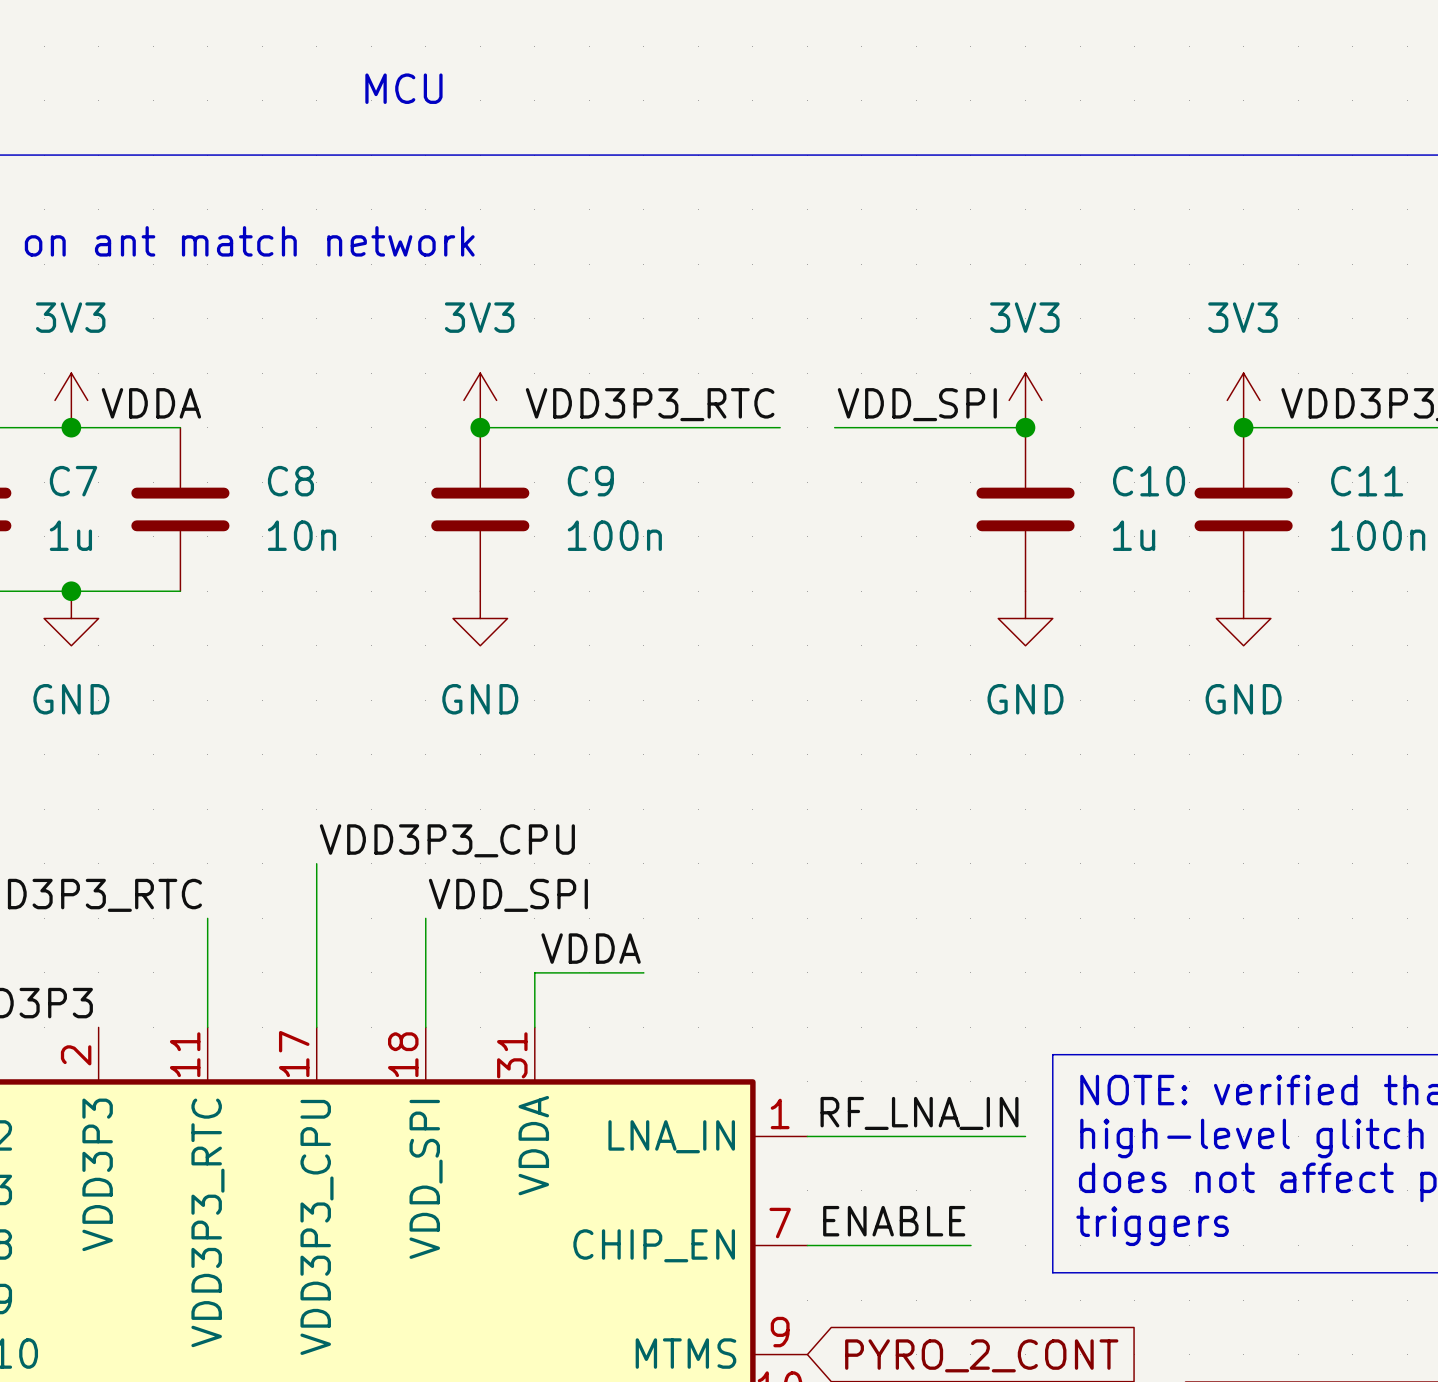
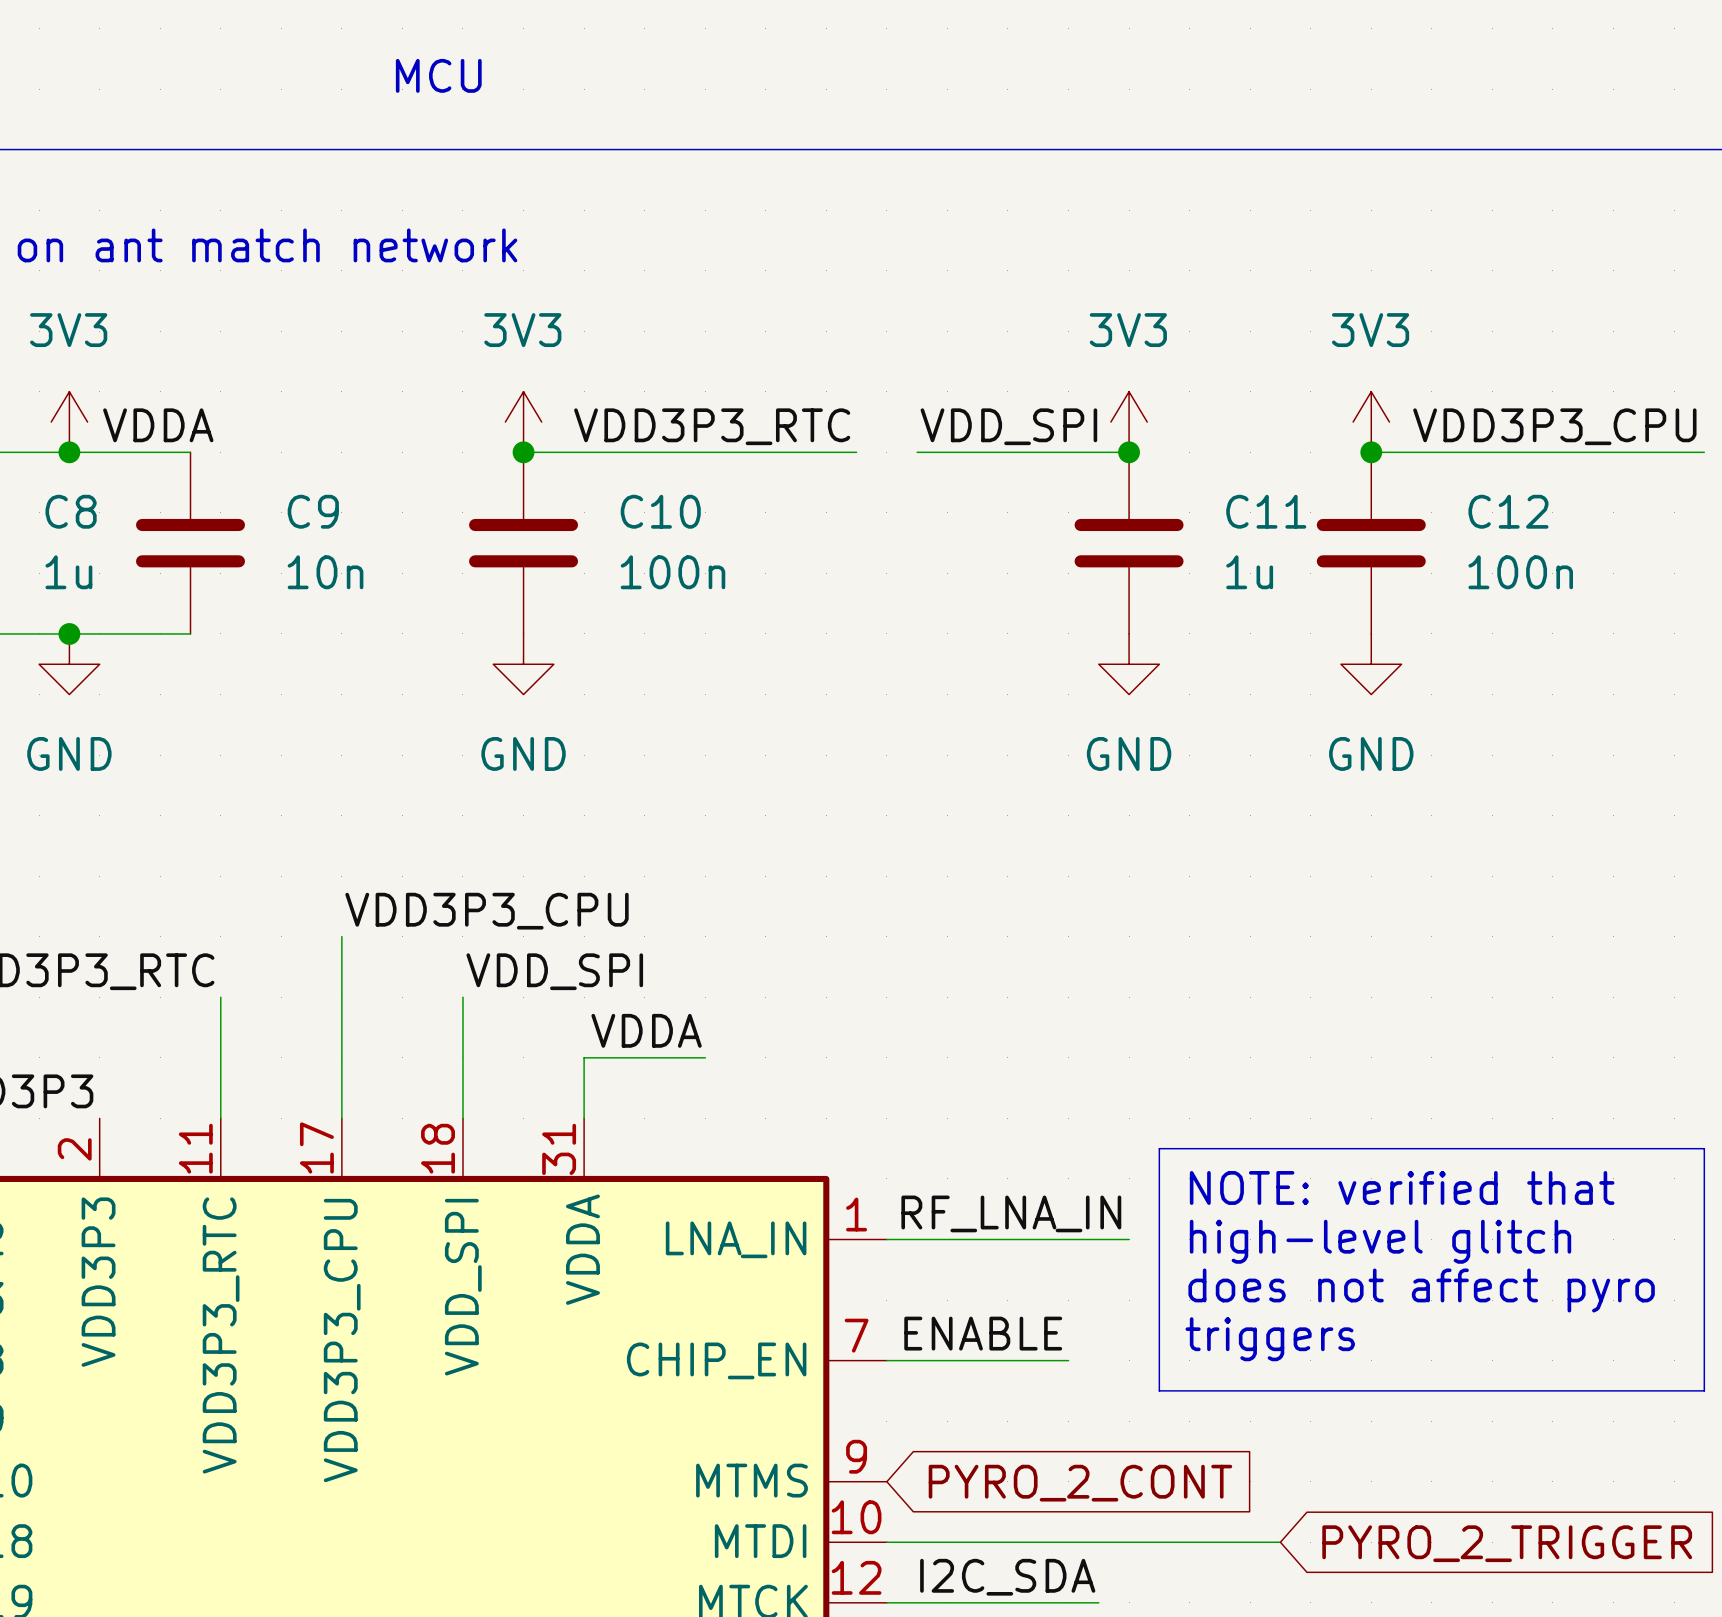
C7 name: C7 (73, 481) -> C8 (71, 511)
C8 name: C8 (290, 481) -> C9 (313, 511)
C9 name: C9 (590, 481) -> C10 (660, 511)
C10 name: C10 (1149, 481) -> C11 (1266, 511)
C11 name: C11 (1367, 481) -> C12 (1508, 511)

